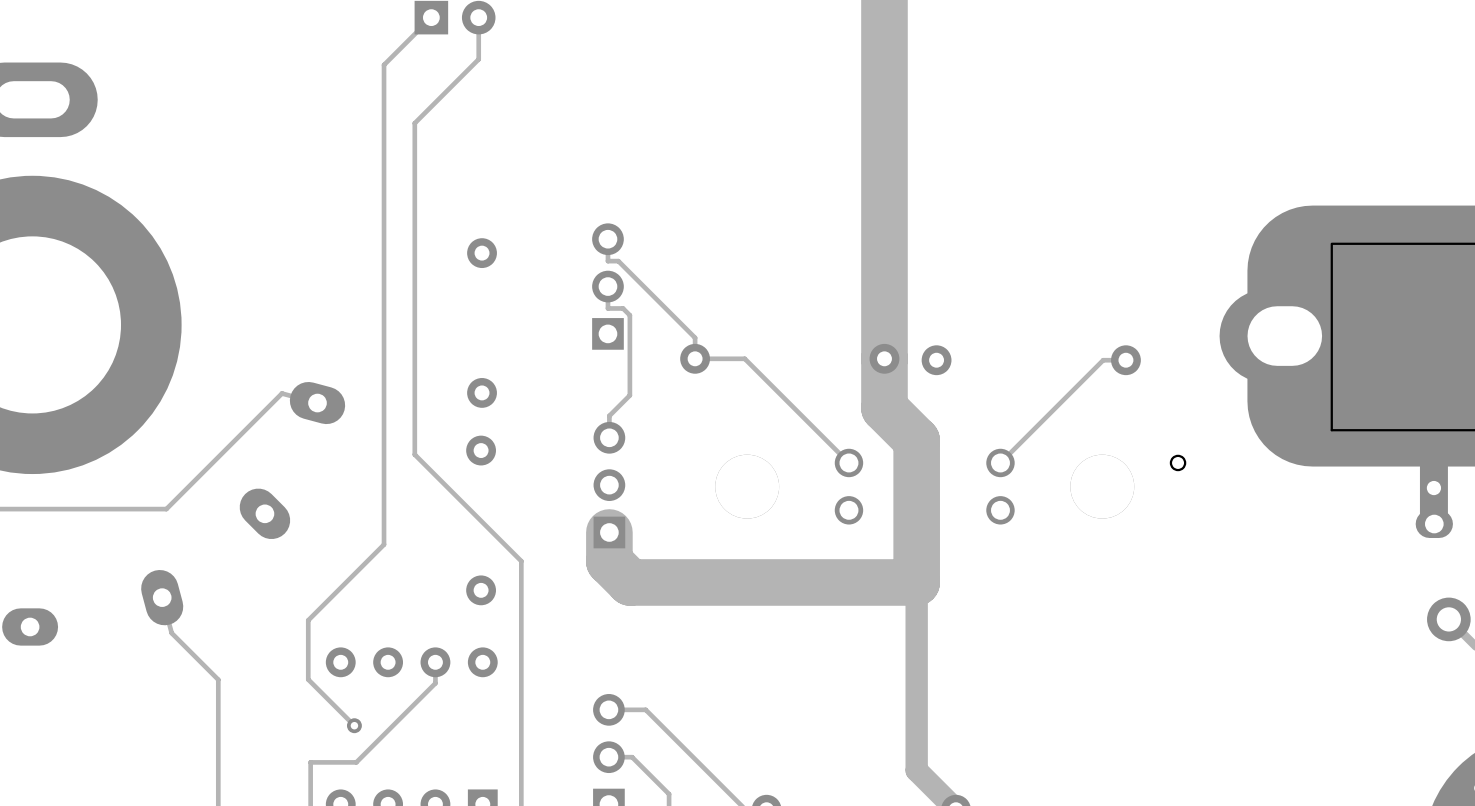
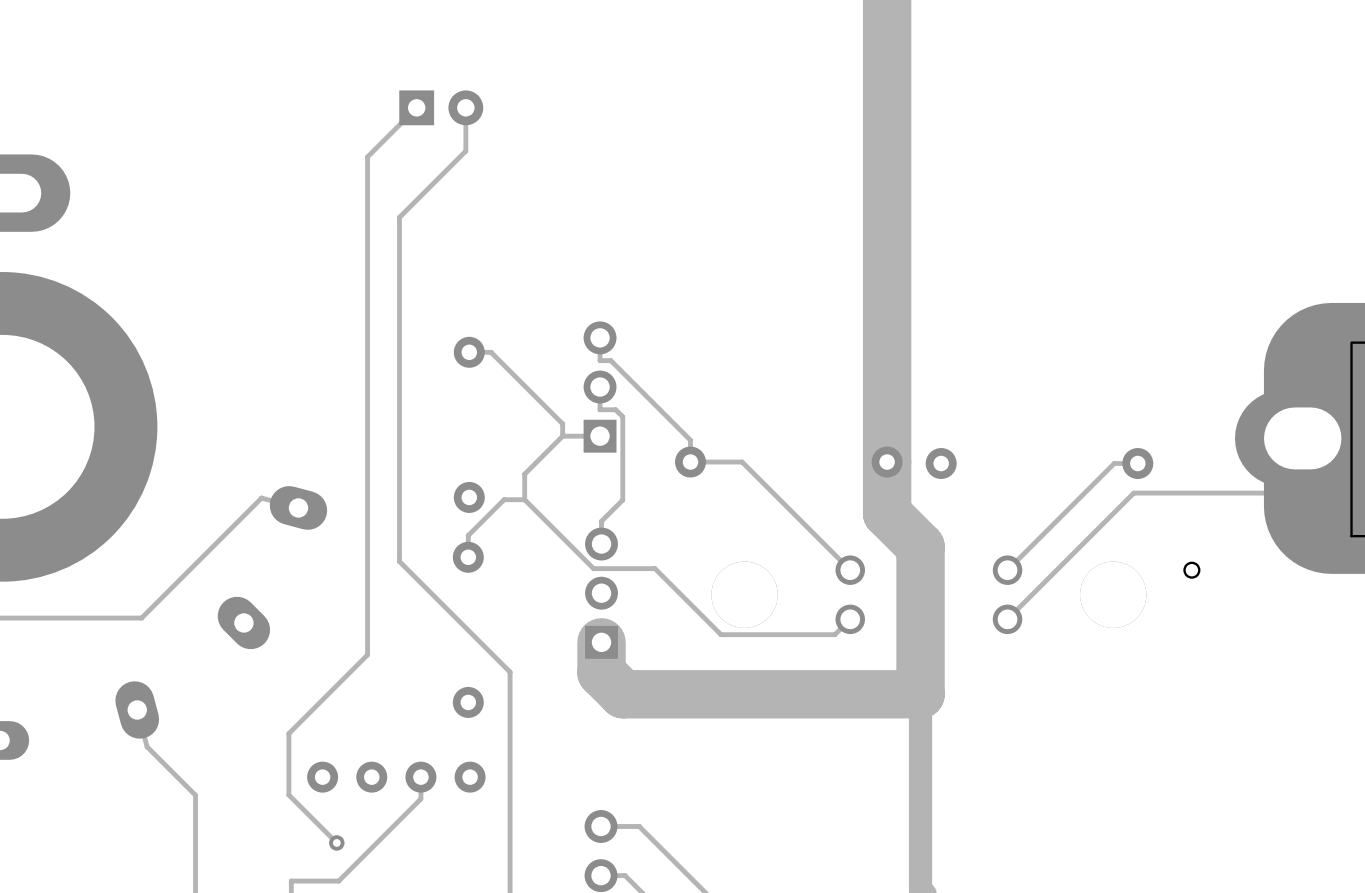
track: none -> (469, 352) (491, 352) (562, 423) (562, 436)
track: none -> (562, 436) (524, 474) (524, 499)
track: none -> (600, 436) (562, 436)
track: none -> (1302, 493) (1133, 493) (1007, 619)
track: none -> (524, 499) (593, 568) (654, 568) (721, 634) (834, 634) (850, 619)
track: none -> (524, 499) (504, 499) (468, 535) (468, 557)

